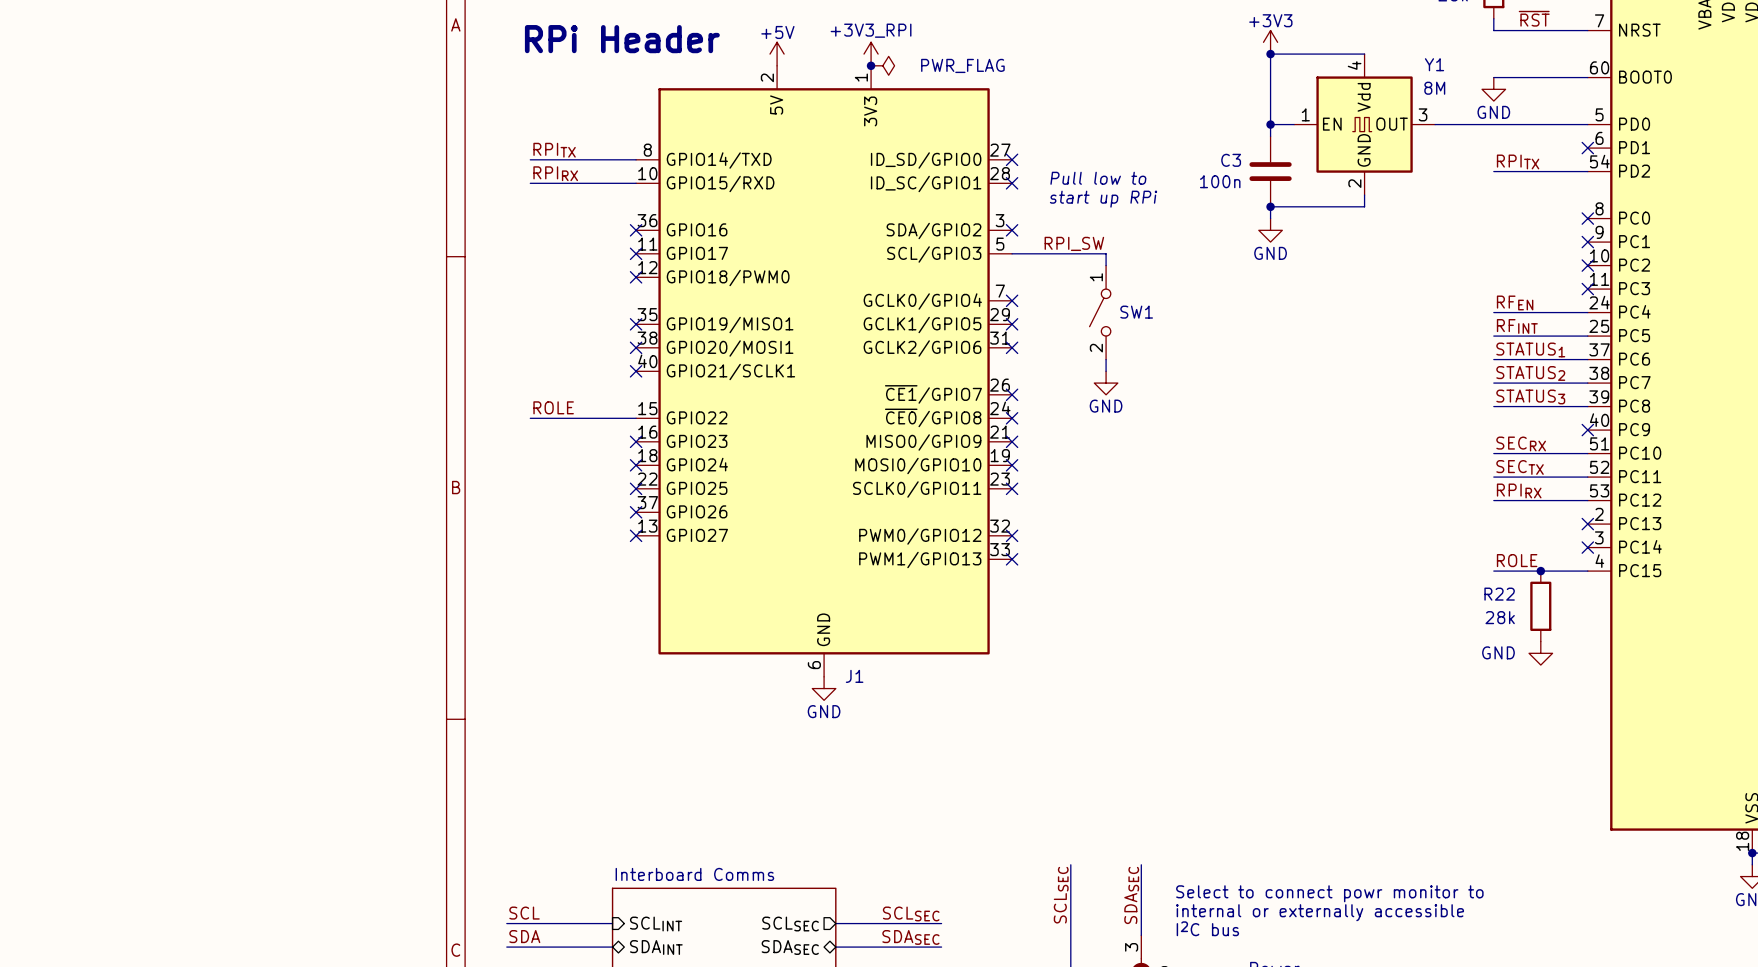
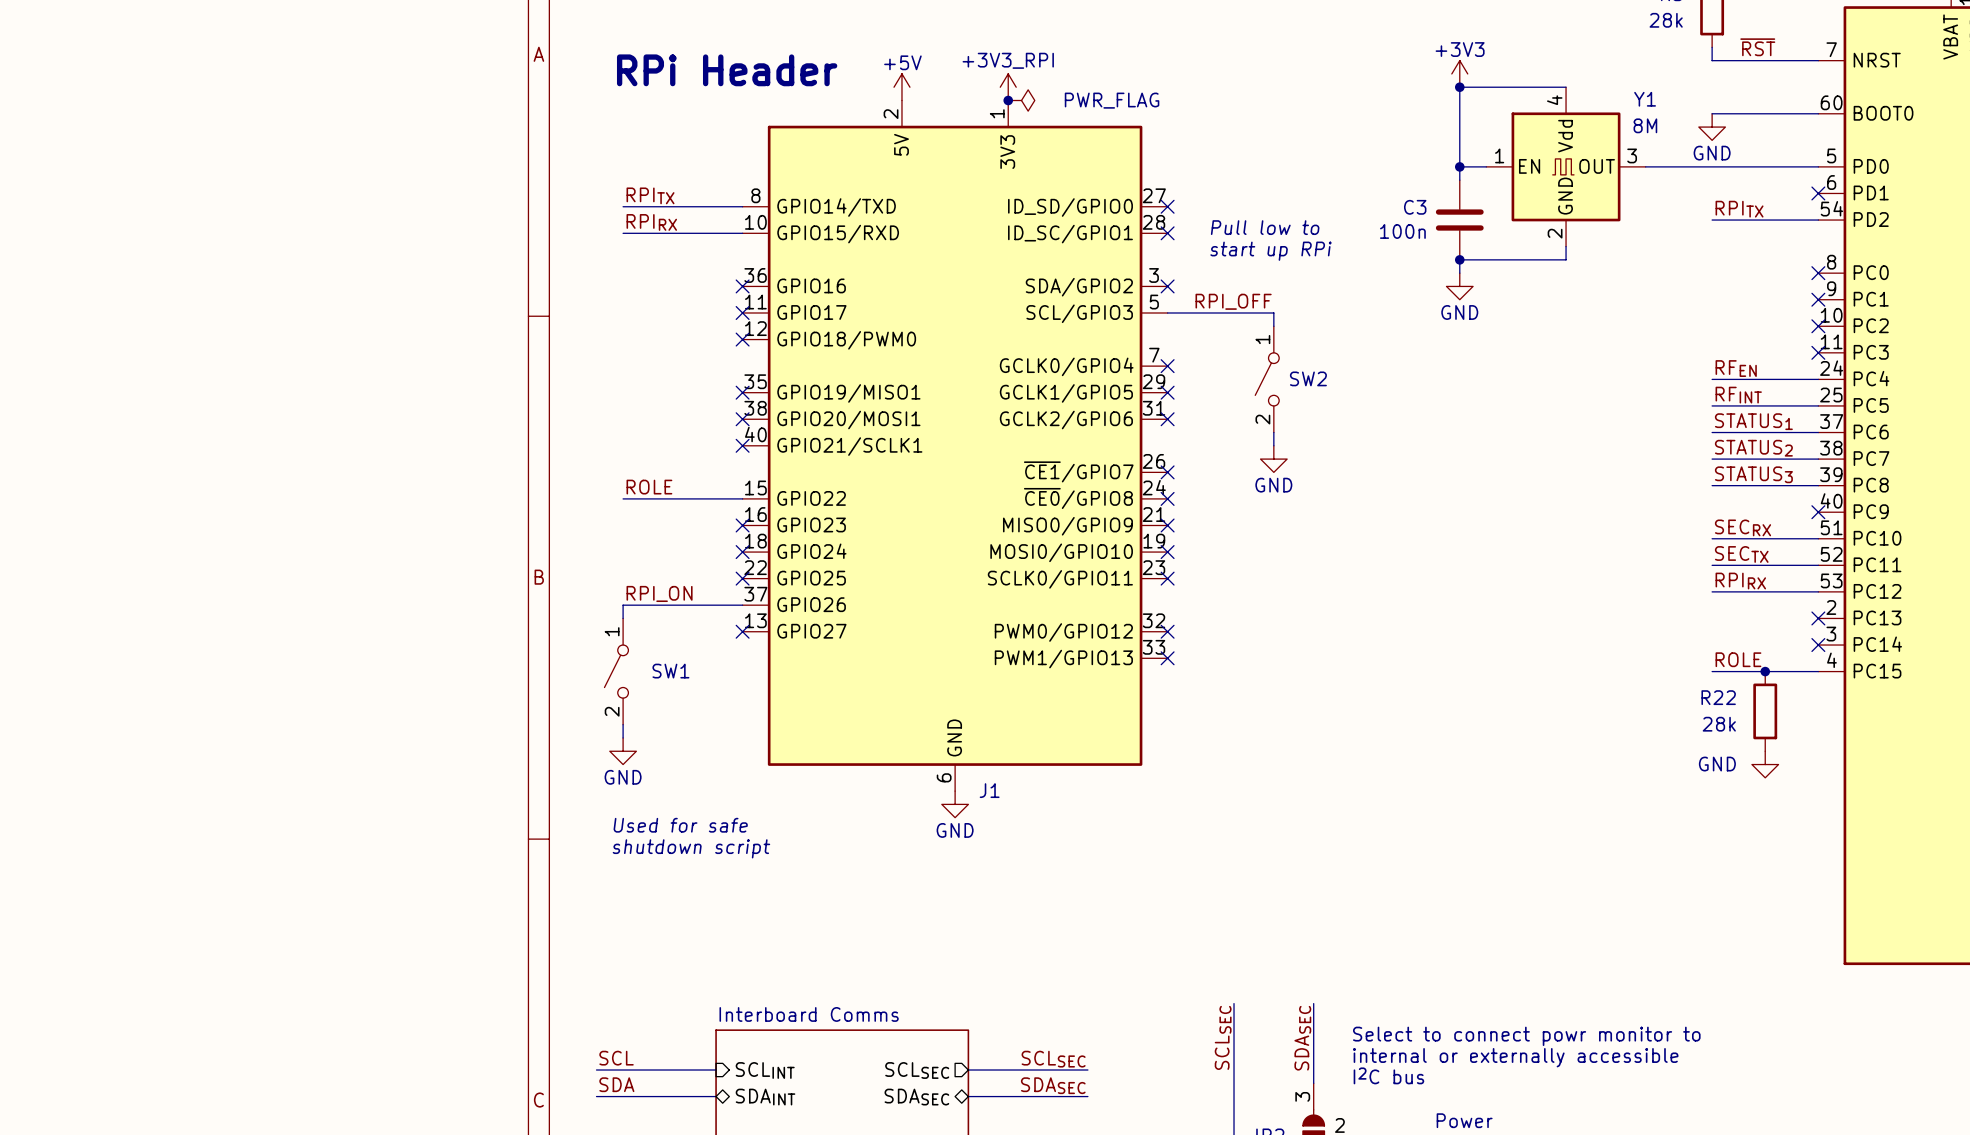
label: RPI_SW (1074, 243) -> RPI_OFF (1233, 301)
SW1 name: SW1 (1136, 312) -> SW2 (1308, 378)
label: none -> RPI_ON (659, 593)
wire: none -> (742, 605) (623, 605) (623, 618)
no-connect mark: (636, 512) -> none
SW1: none -> (616, 671)
wire: none -> (623, 724) (623, 737)
power symbol: none -> GND (623, 751)
text: none -> Used for safe (680, 825)
text: none -> shutdown script (691, 848)

